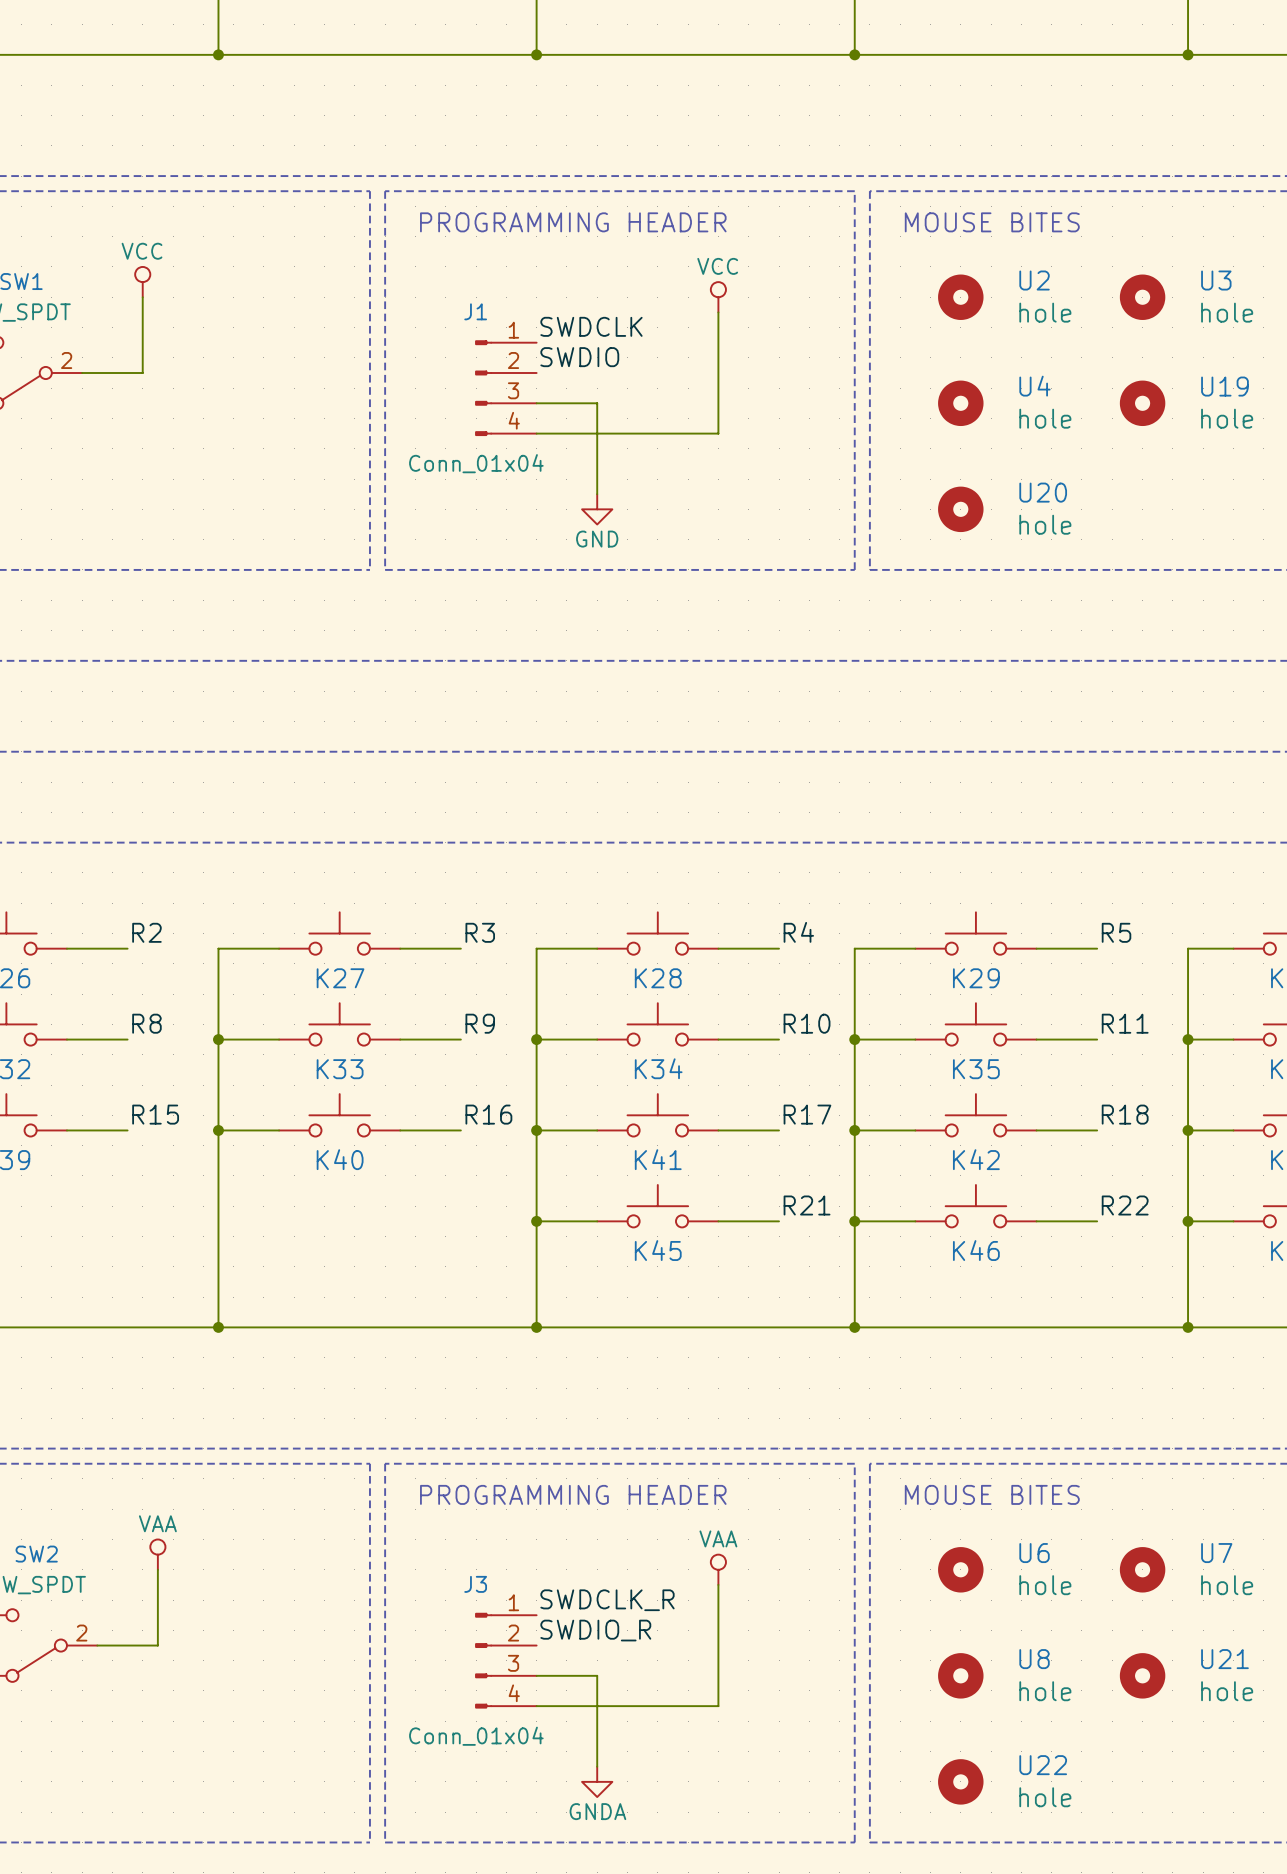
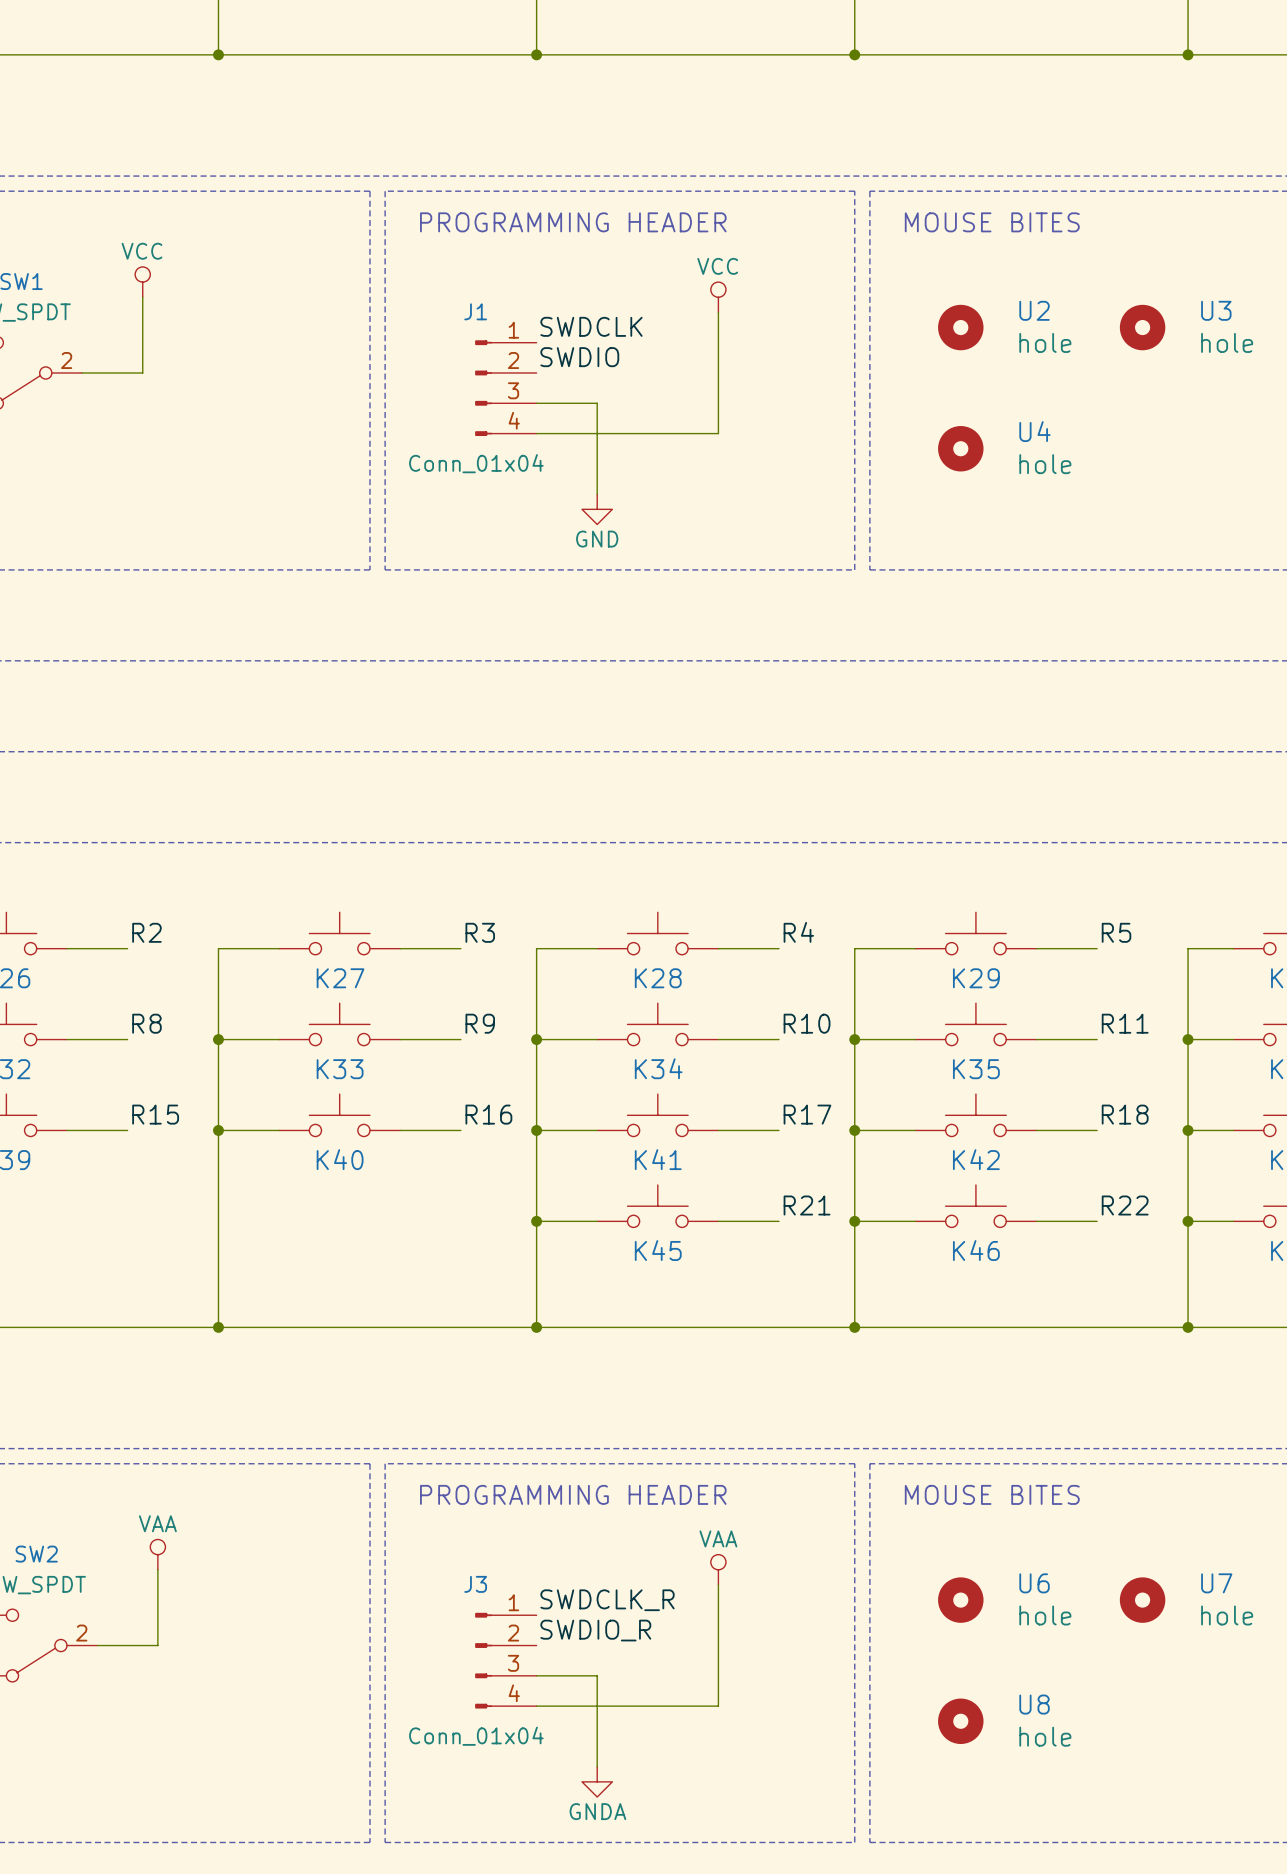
U2 position: (960, 297) -> (960, 327)
U3 position: (1142, 297) -> (1142, 327)
U4 position: (960, 403) -> (960, 448)
U19: hole (1142, 403) -> none
U20: hole (960, 509) -> none
U6 position: (960, 1569) -> (960, 1600)
U7 position: (1142, 1569) -> (1142, 1600)
U8 position: (960, 1675) -> (960, 1721)
U21: hole (1142, 1675) -> none
U22: hole (960, 1781) -> none

